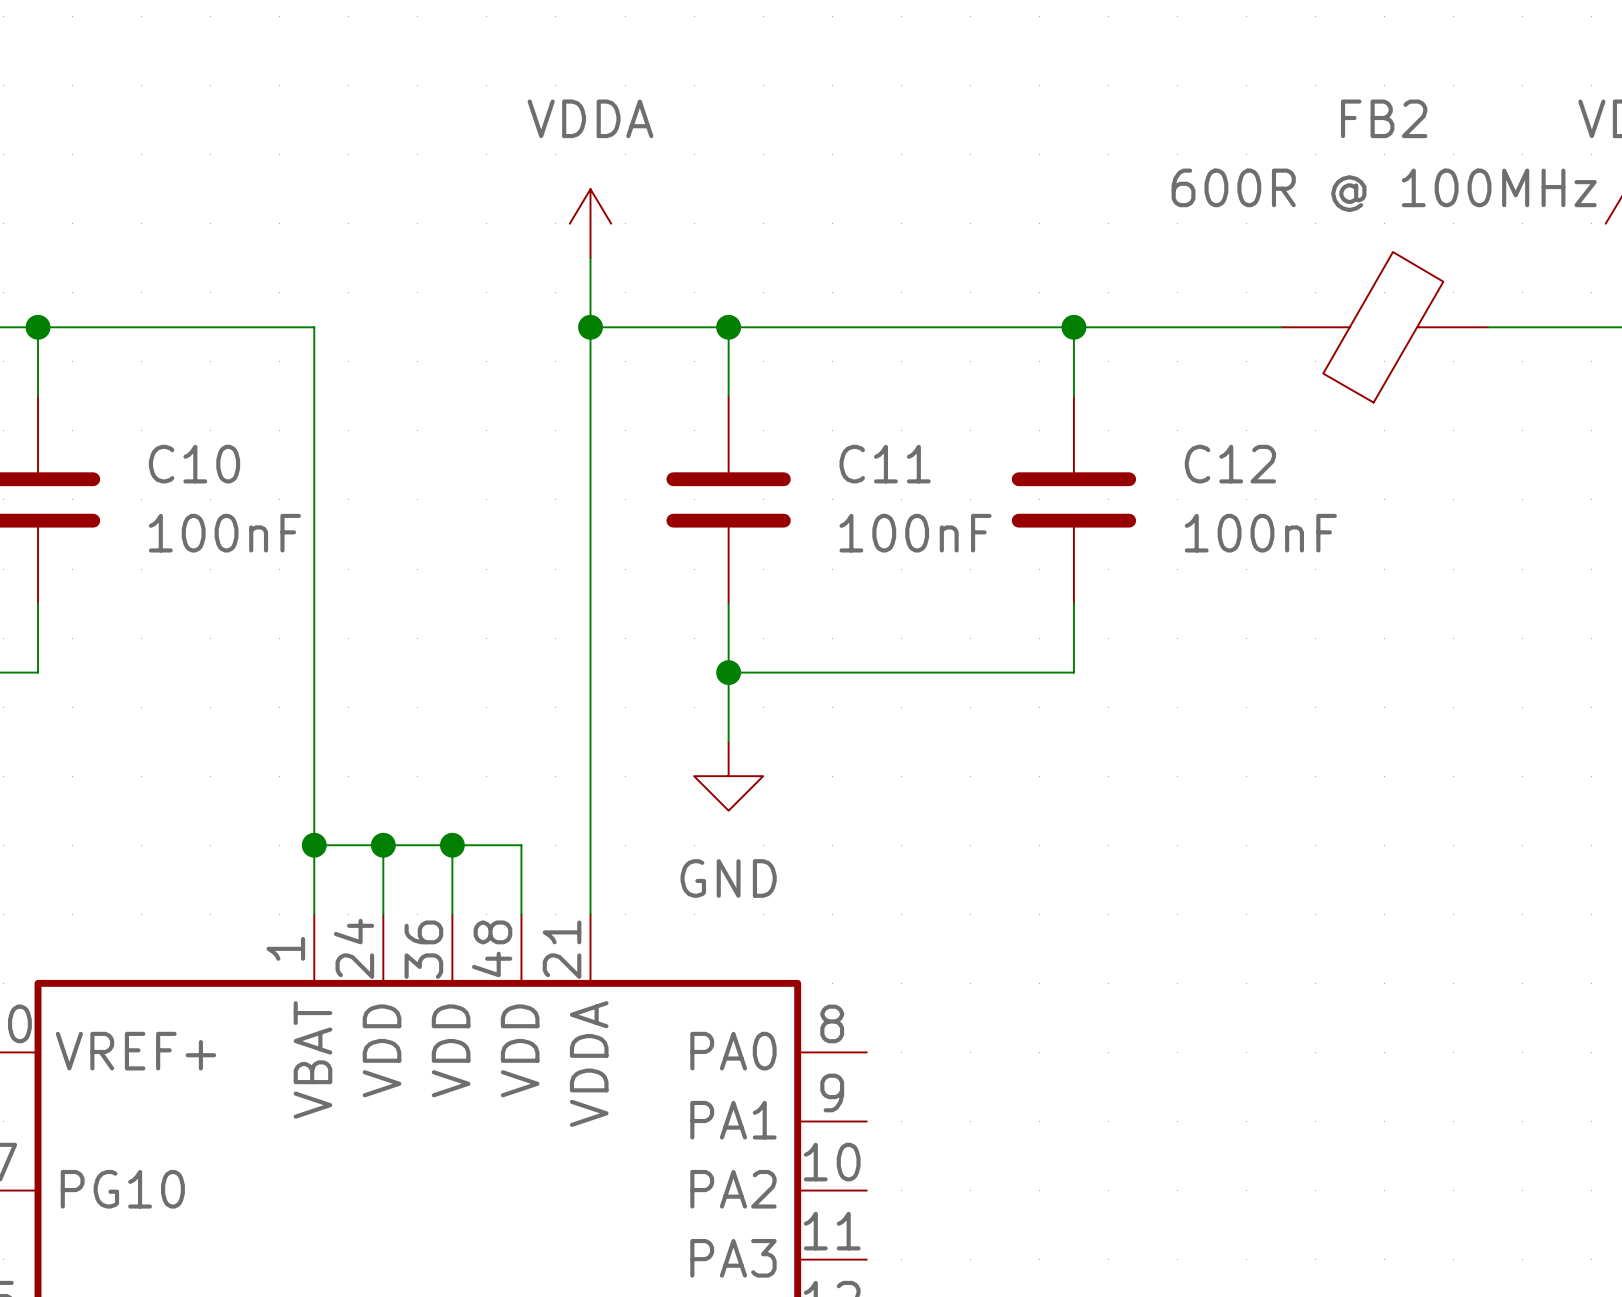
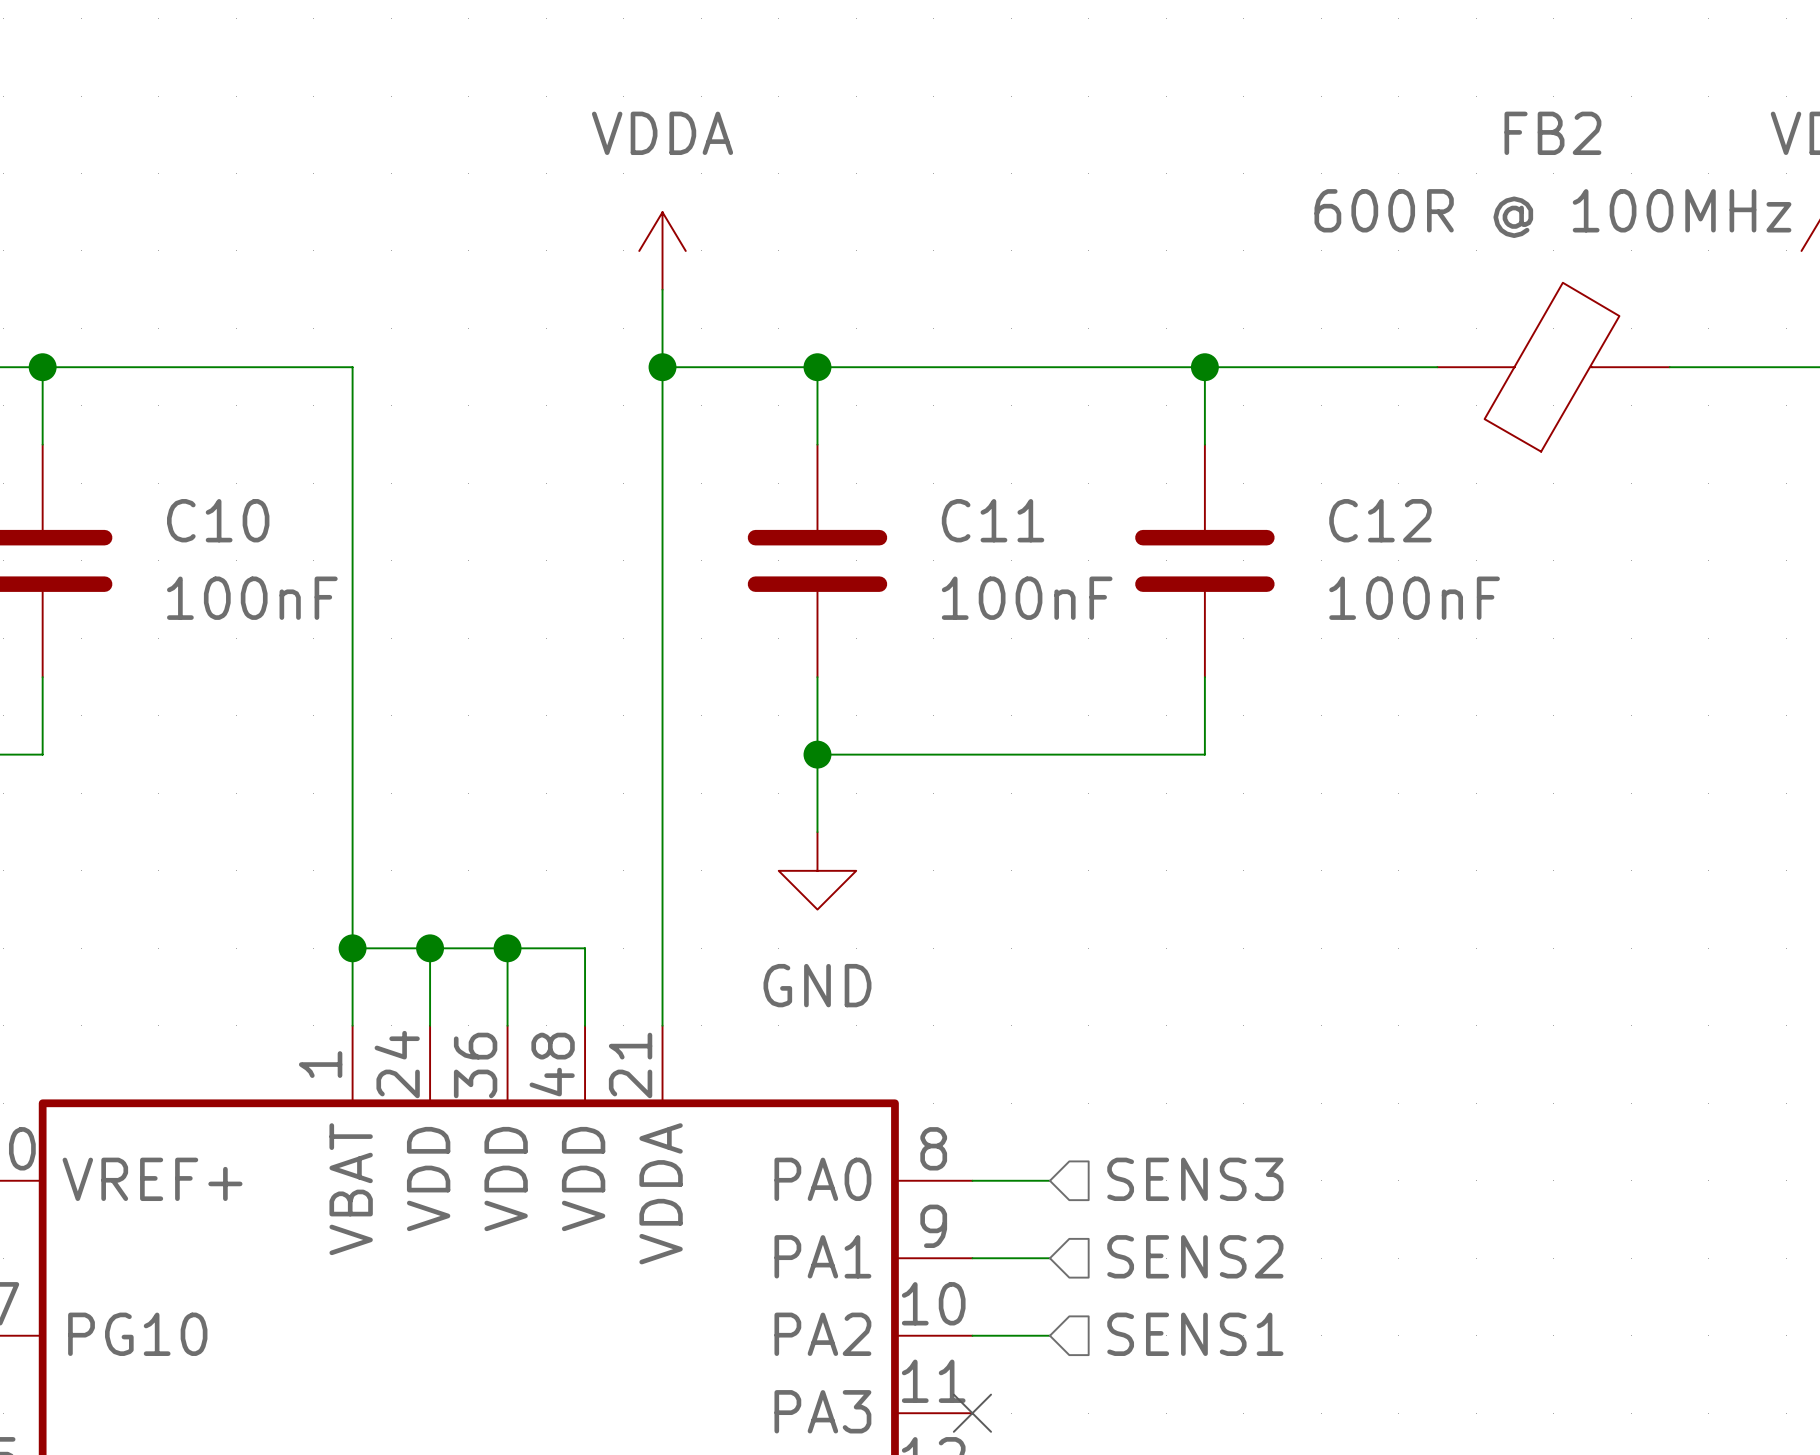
hierarchical label: none -> SENS3 (1195, 1179)
wire: none -> (972, 1180) (1049, 1180)
hierarchical label: none -> SENS2 (1195, 1256)
wire: none -> (972, 1258) (1049, 1258)
hierarchical label: none -> SENS1 (1195, 1334)
wire: none -> (972, 1335) (1049, 1335)
no-connect mark: none -> (972, 1413)

